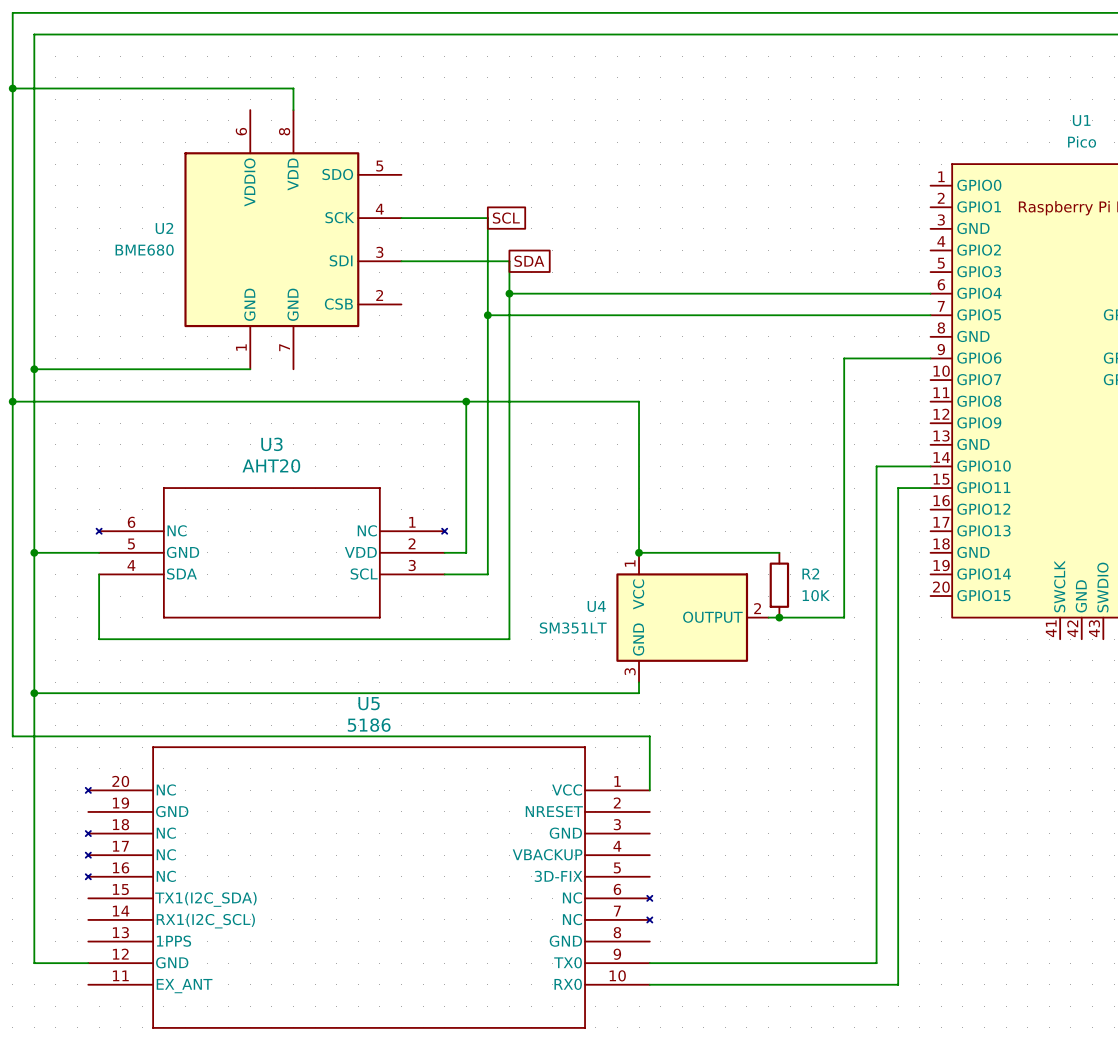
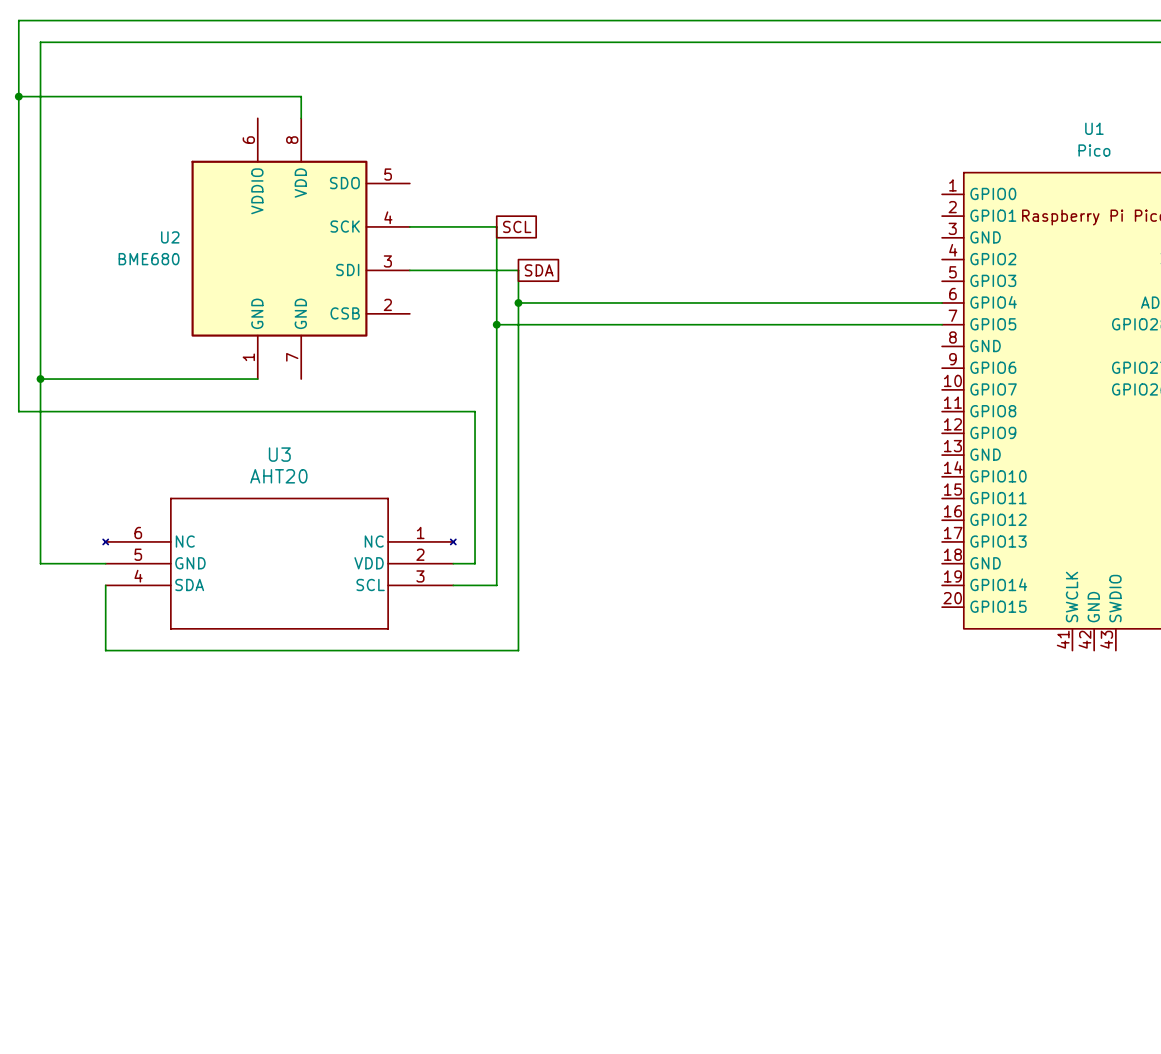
wire: (930, 358) (844, 358) (844, 617) (768, 617) -> none
wire: (12, 401) (12, 736) (649, 736) (649, 790) -> none
junction: (12, 401) -> none
wire: (466, 401) (639, 401) (639, 552) (779, 552) -> none
junction: (466, 401) -> none
wire: (930, 466) (876, 466) (876, 963) (649, 963) -> none
wire: (930, 488) (898, 488) (898, 984) (649, 984) -> none
wire: (34, 552) (34, 963) (88, 963) -> none
junction: (34, 552) -> none
junction: (639, 552) -> none
R2: 10K (779, 585) -> none
U4: SM351LT (692, 617) -> none
junction: (779, 617) -> none
wire: (639, 682) (639, 693) (34, 693) -> none
junction: (34, 693) -> none
U5: 5186 (369, 887) -> none

